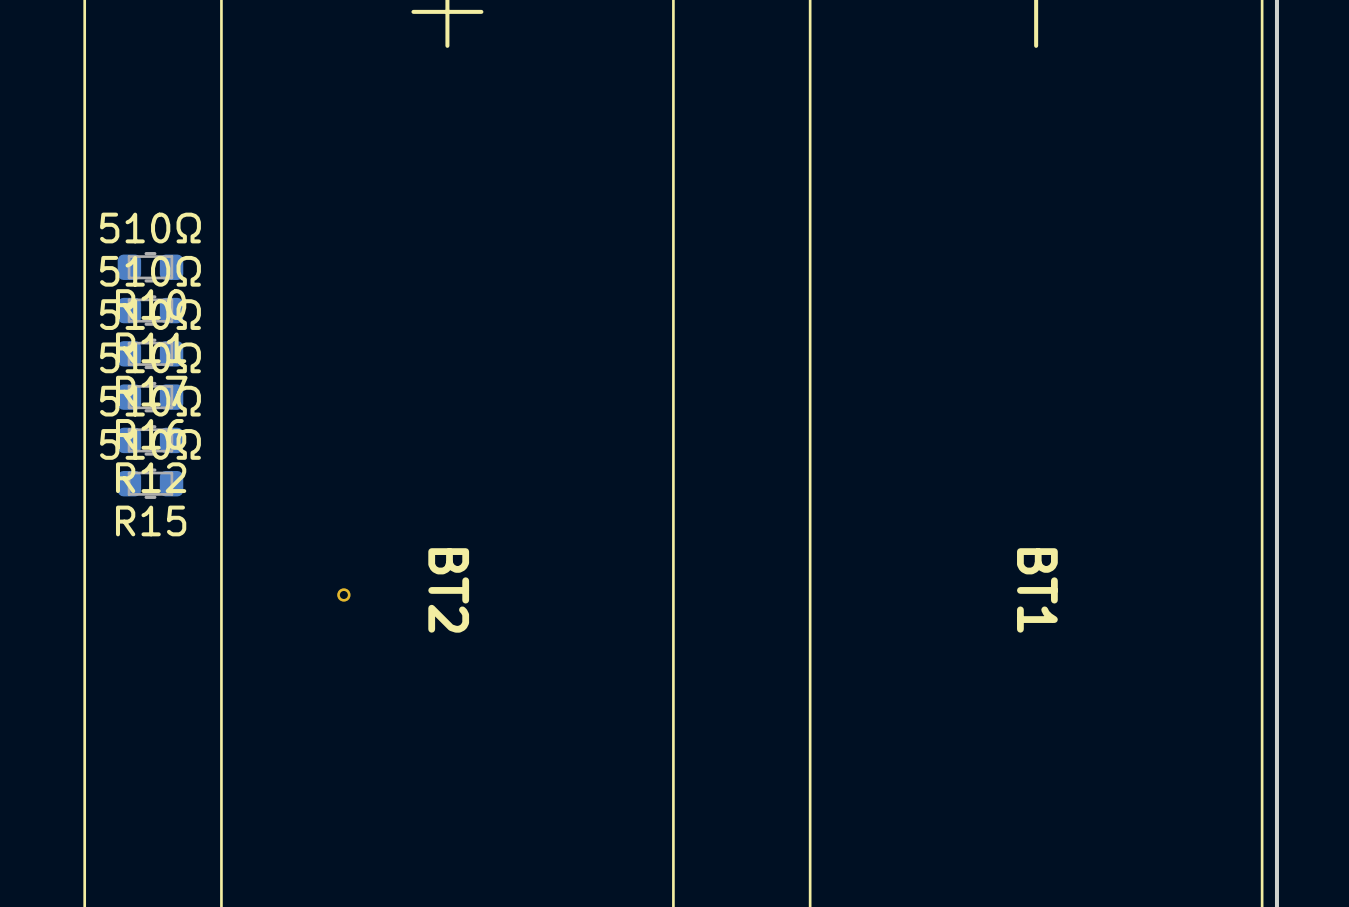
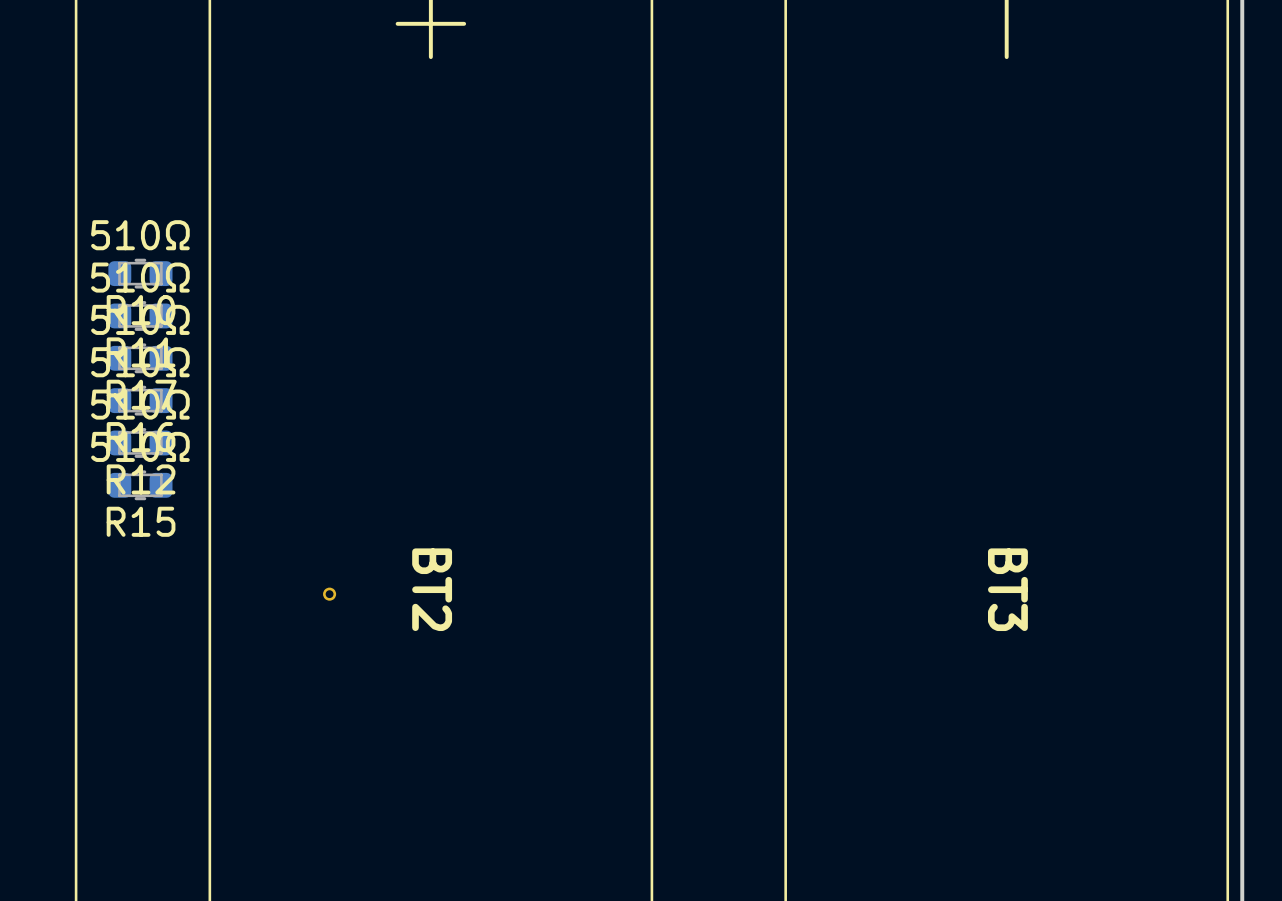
BT1 name: BT1 (1037, 590) -> BT3 (1007, 589)

